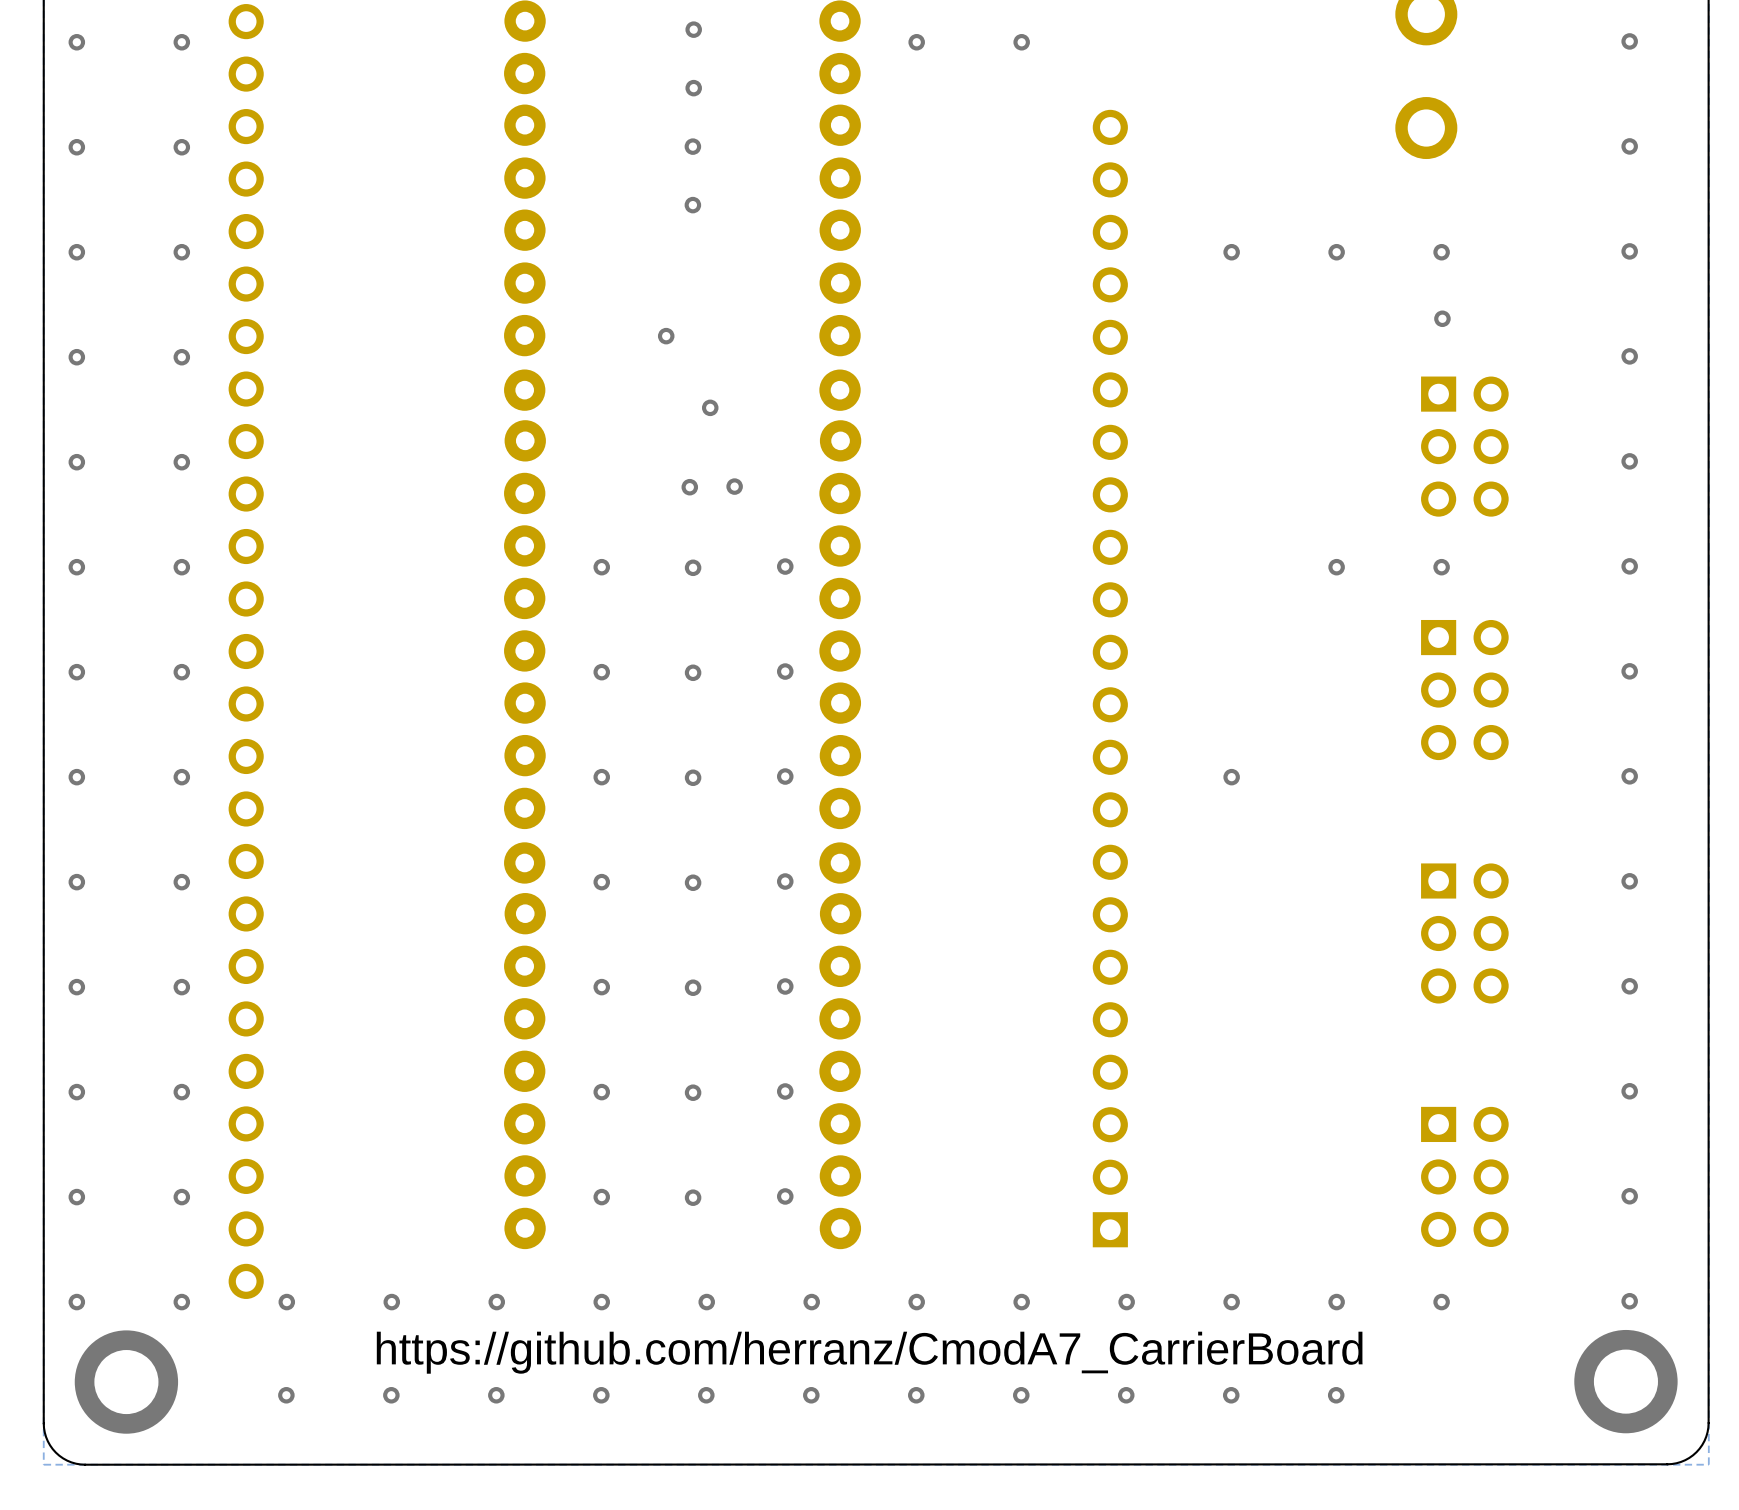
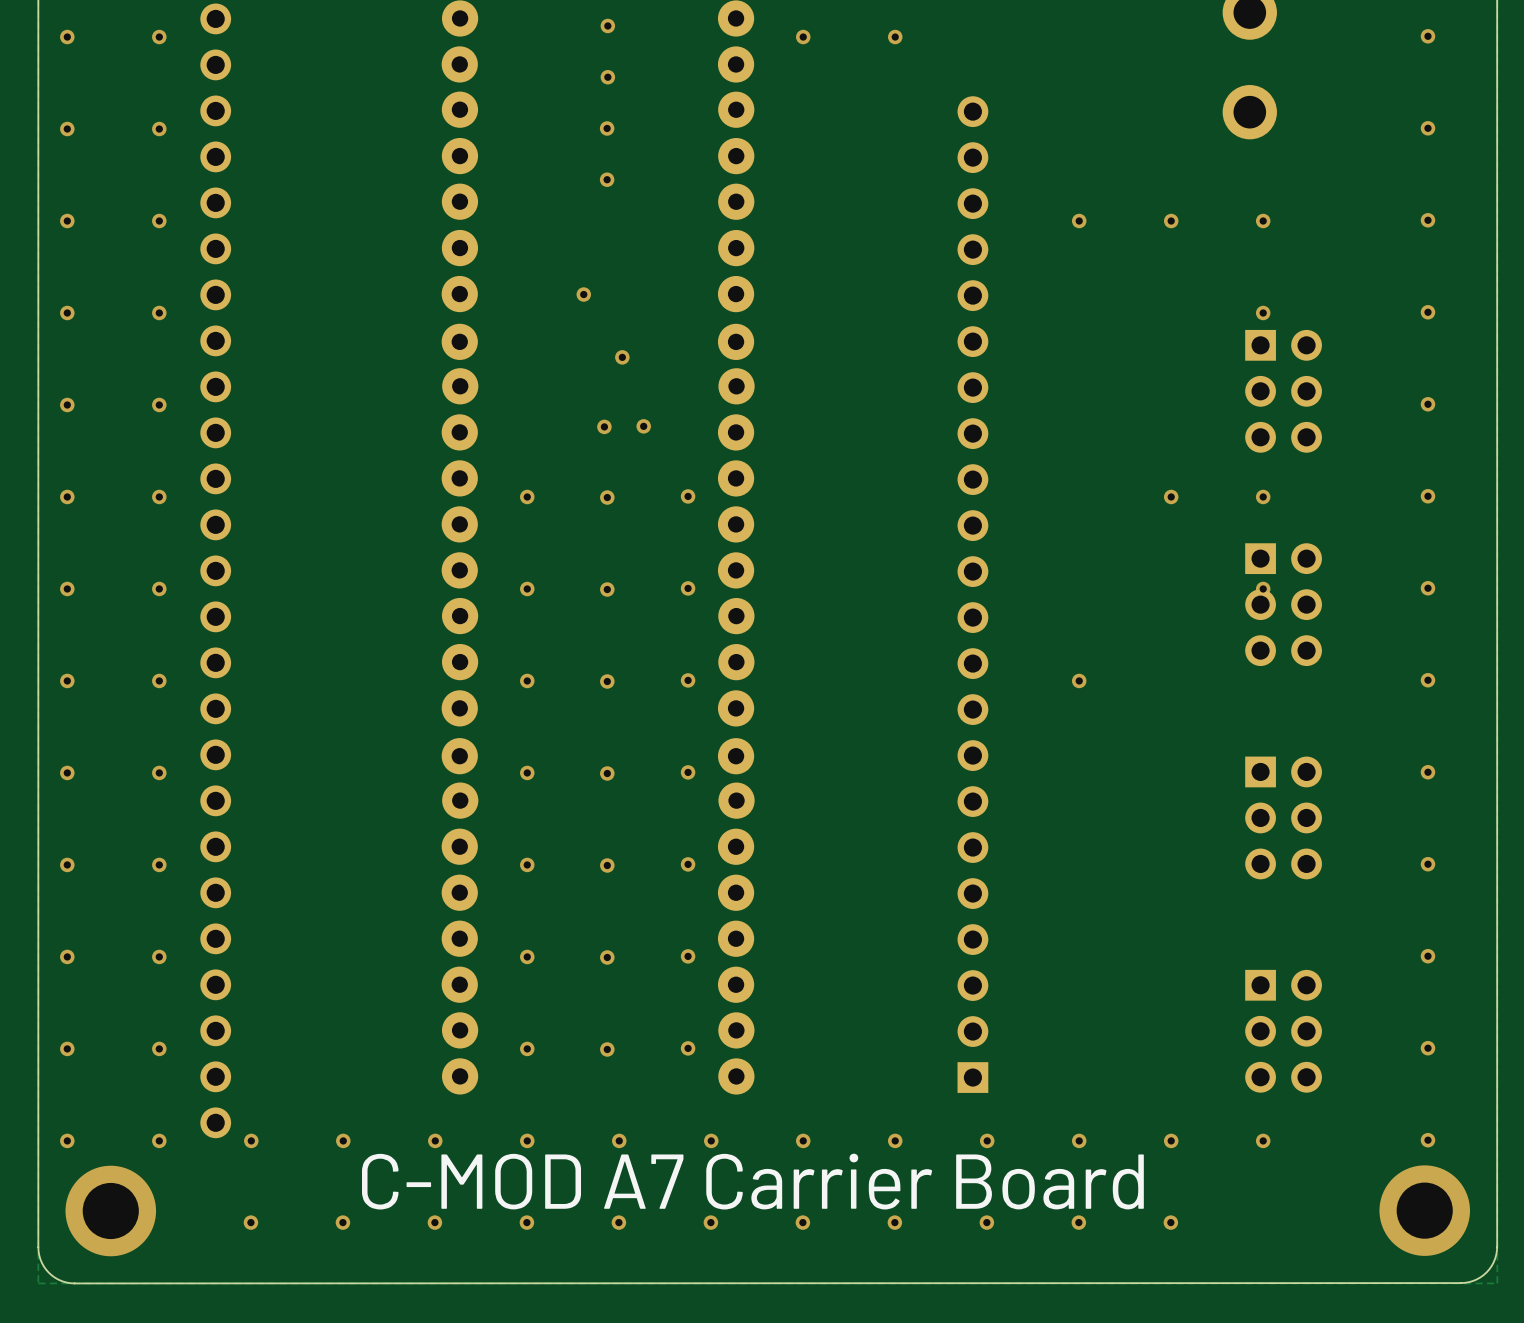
via position: (1442, 318) -> (1263, 313)
via: none -> (1263, 588)
text: https://github.com/herranz/CmodA7_CarrierBoard (869, 1352) -> C-MOD A7 Carrier Board (752, 1181)

